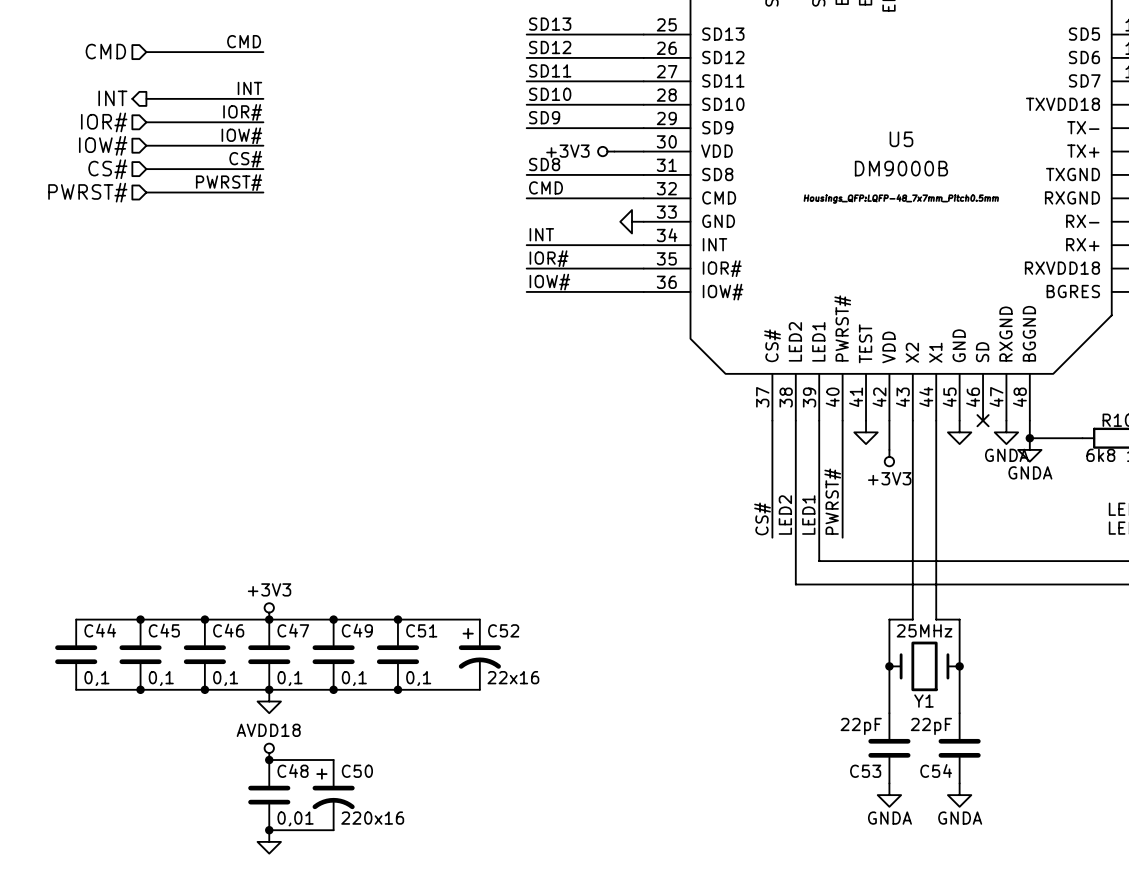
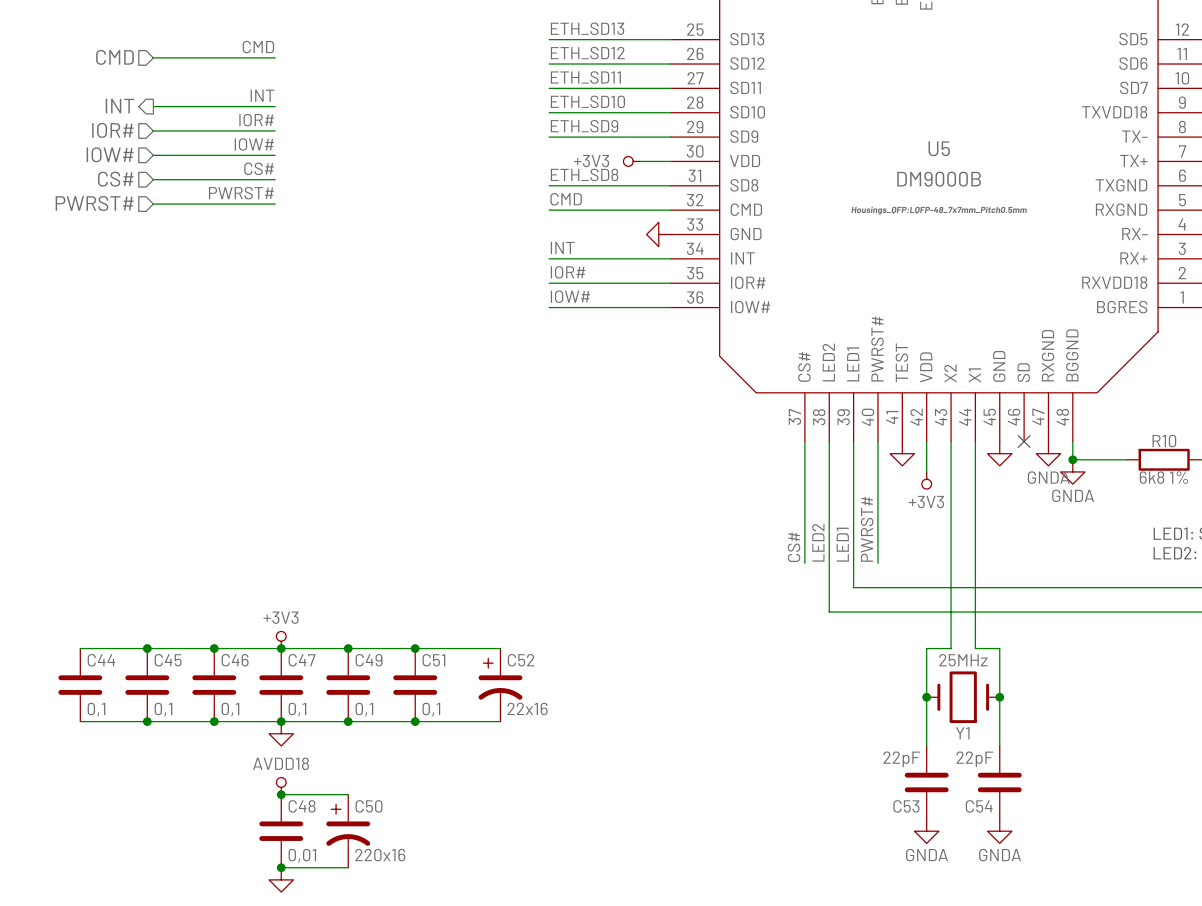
label: SD13 (550, 24) -> ETH_SD13 (587, 28)
label: SD12 (550, 47) -> ETH_SD12 (587, 53)
label: SD11 (550, 70) -> ETH_SD11 (585, 77)
label: SD10 (550, 94) -> ETH_SD10 (587, 101)
label: SD9 (544, 117) -> ETH_SD9 (584, 126)
label: SD8 (544, 164) -> ETH_SD8 (584, 174)

